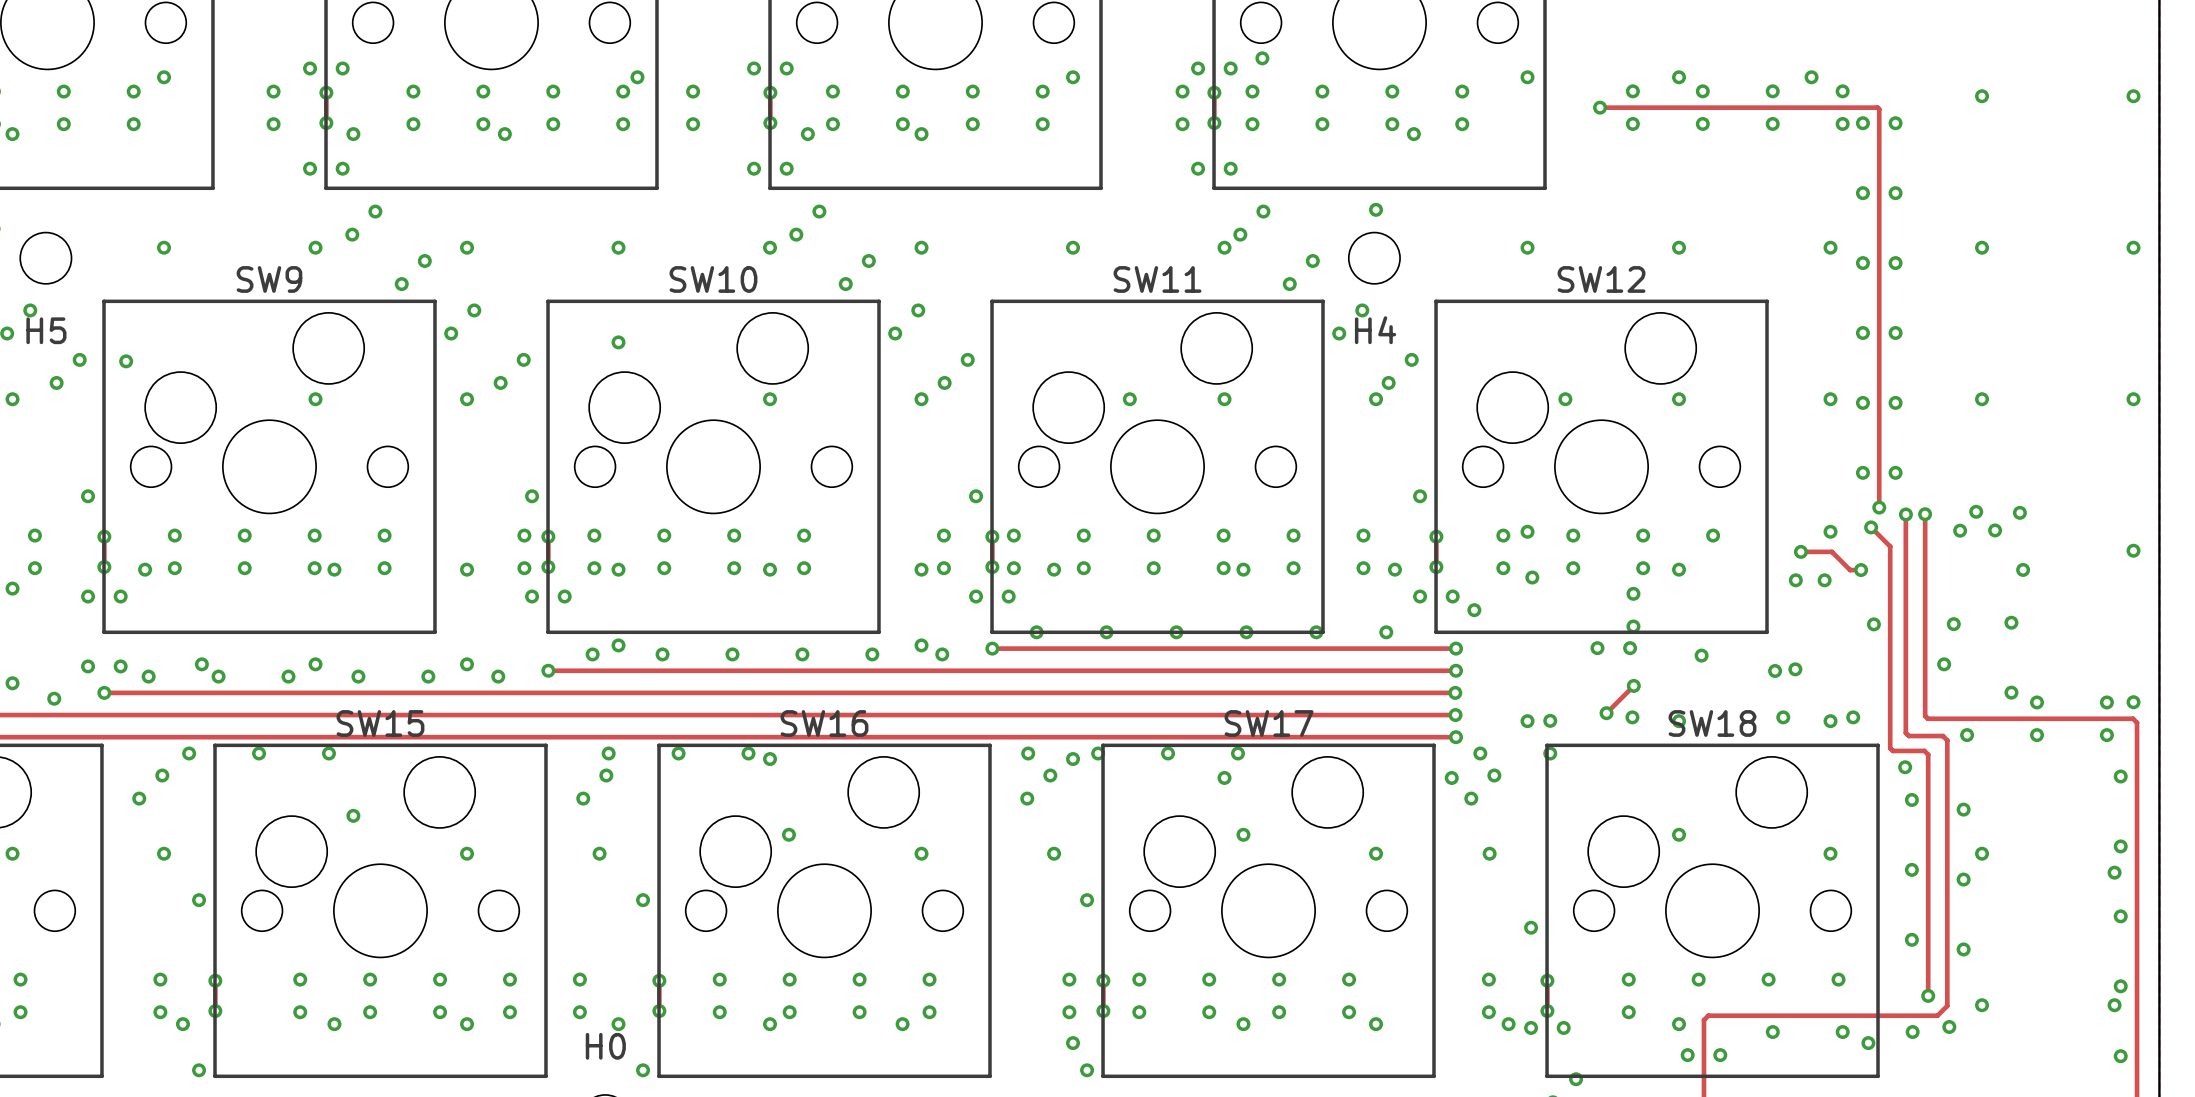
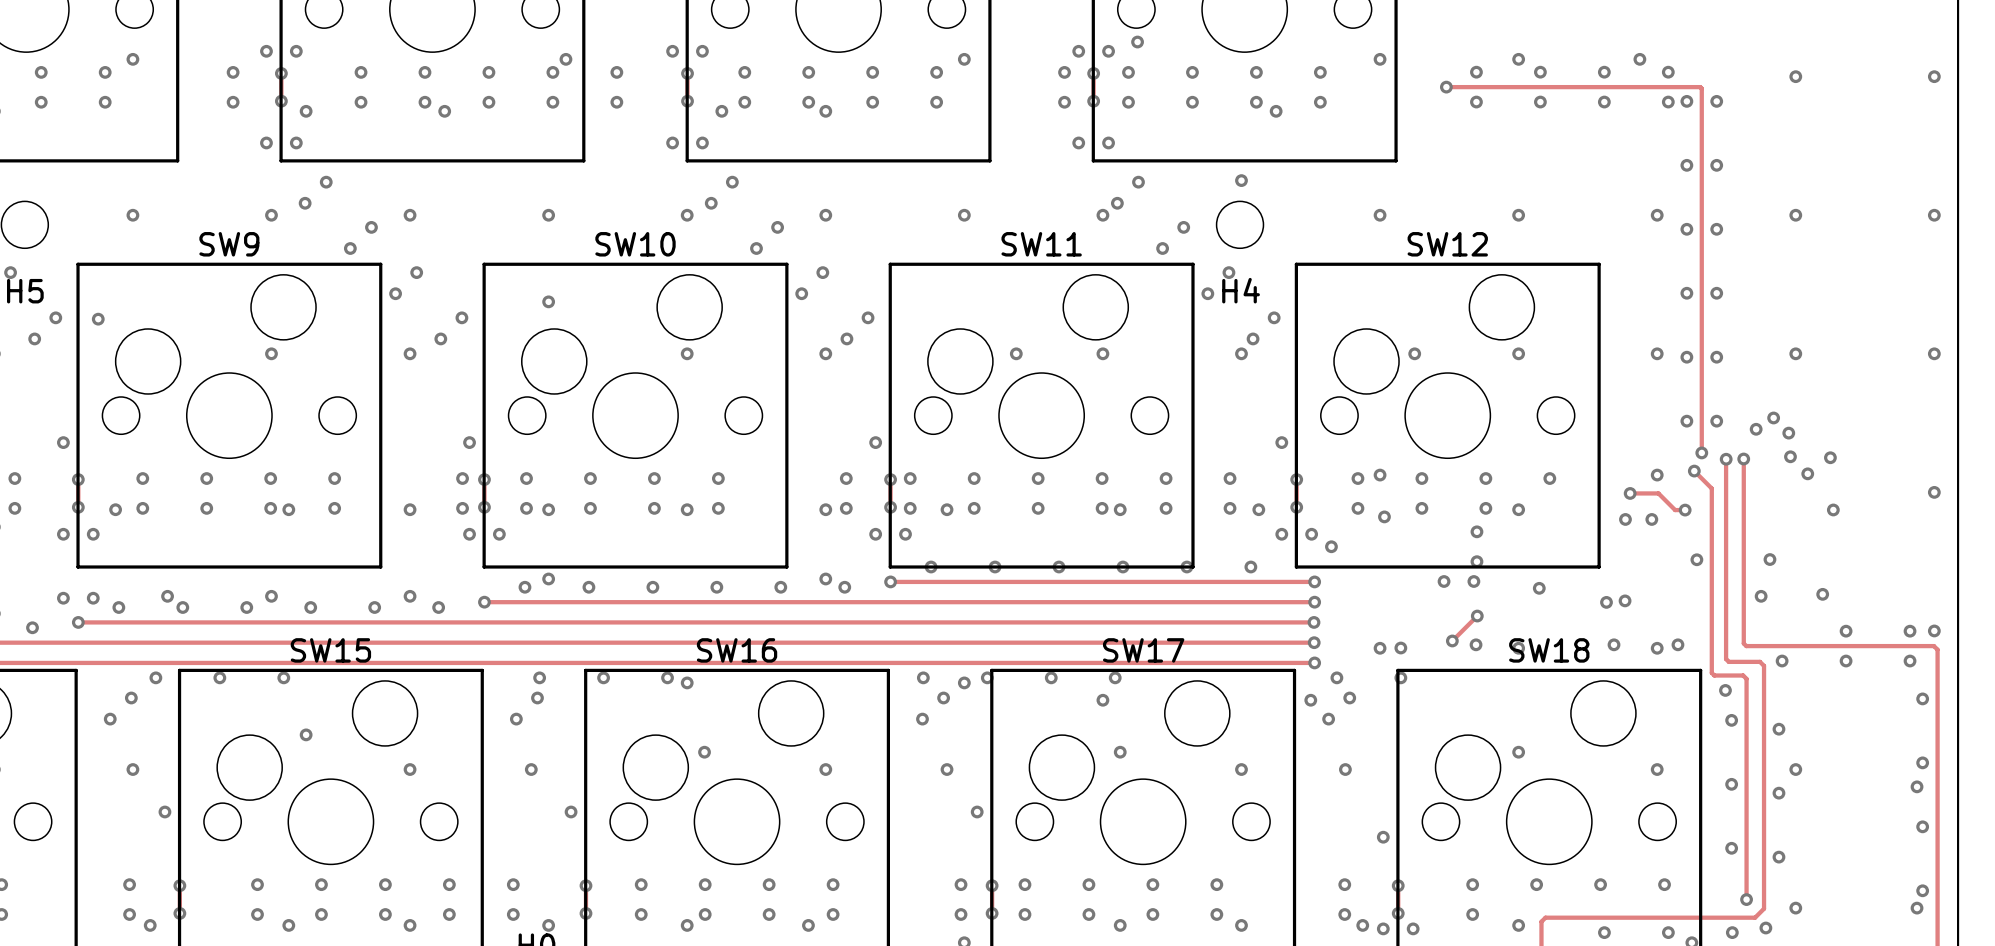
via: none -> (1773, 417)
via: none -> (1756, 429)
via: none -> (1788, 433)
via: (1960, 530) -> none
via: (2011, 622) -> none
via: none -> (1822, 594)
via: (2011, 692) -> none

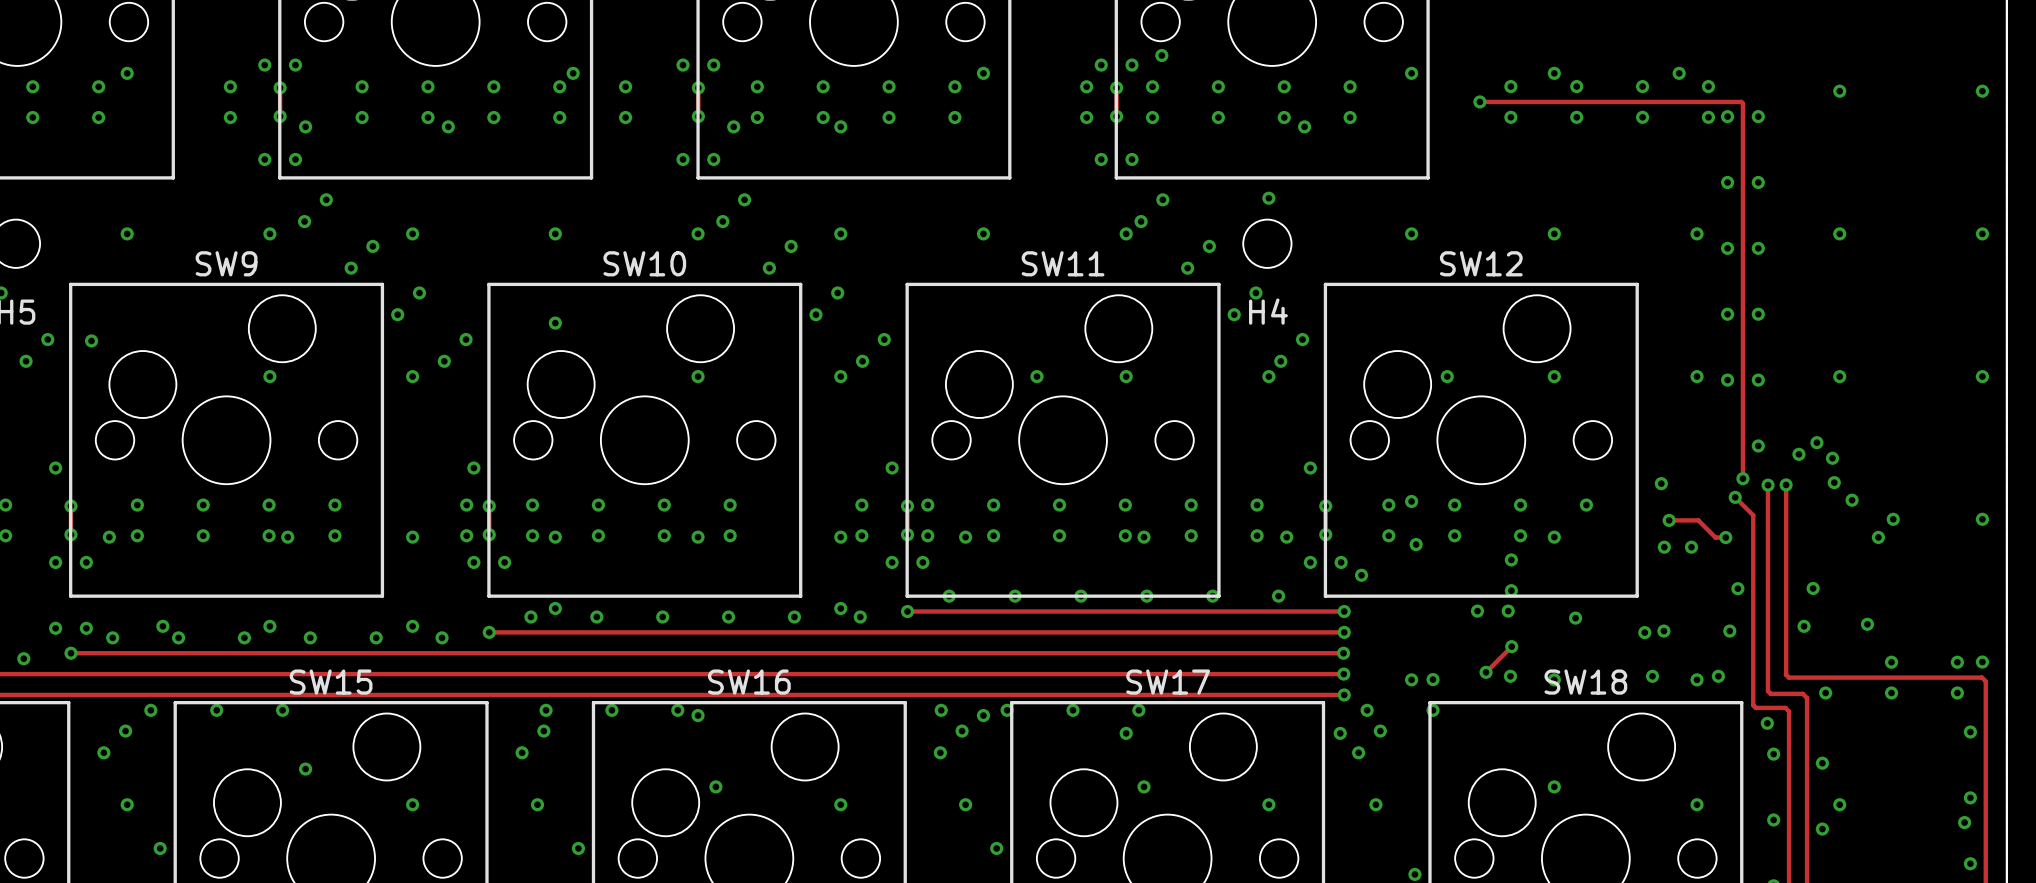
via: (1686, 421) -> none
via: none -> (1661, 483)
via position: (1830, 457) -> (1893, 519)
via: (1657, 475) -> none
via: none -> (1729, 631)

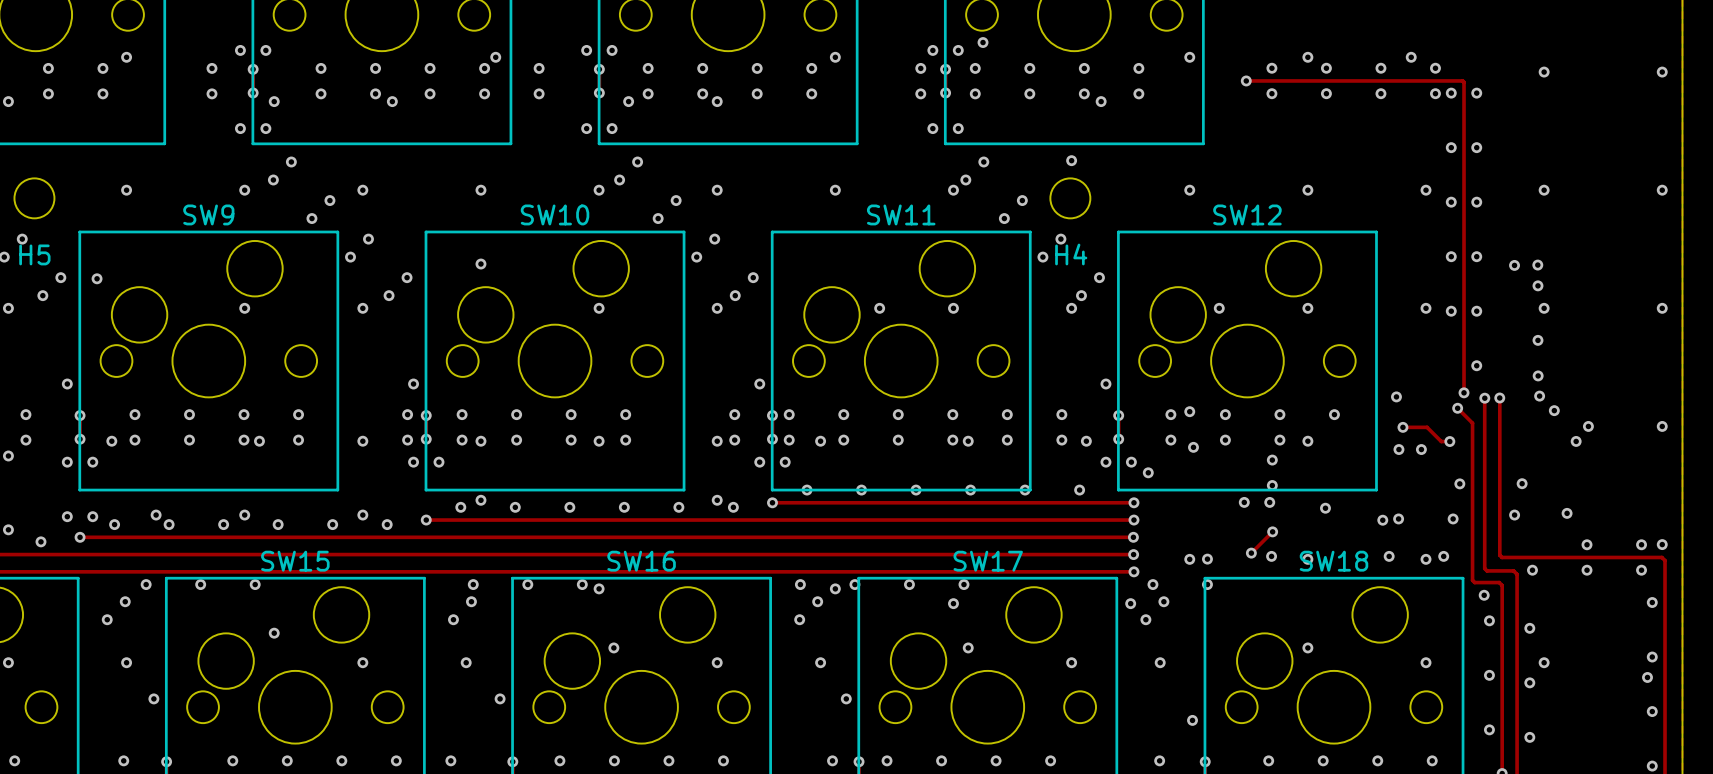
via: none -> (1514, 265)
via: none -> (1537, 265)
via: none -> (1537, 285)
via: none -> (1537, 340)
via: (1816, 442) -> none
via: (1798, 454) -> none

